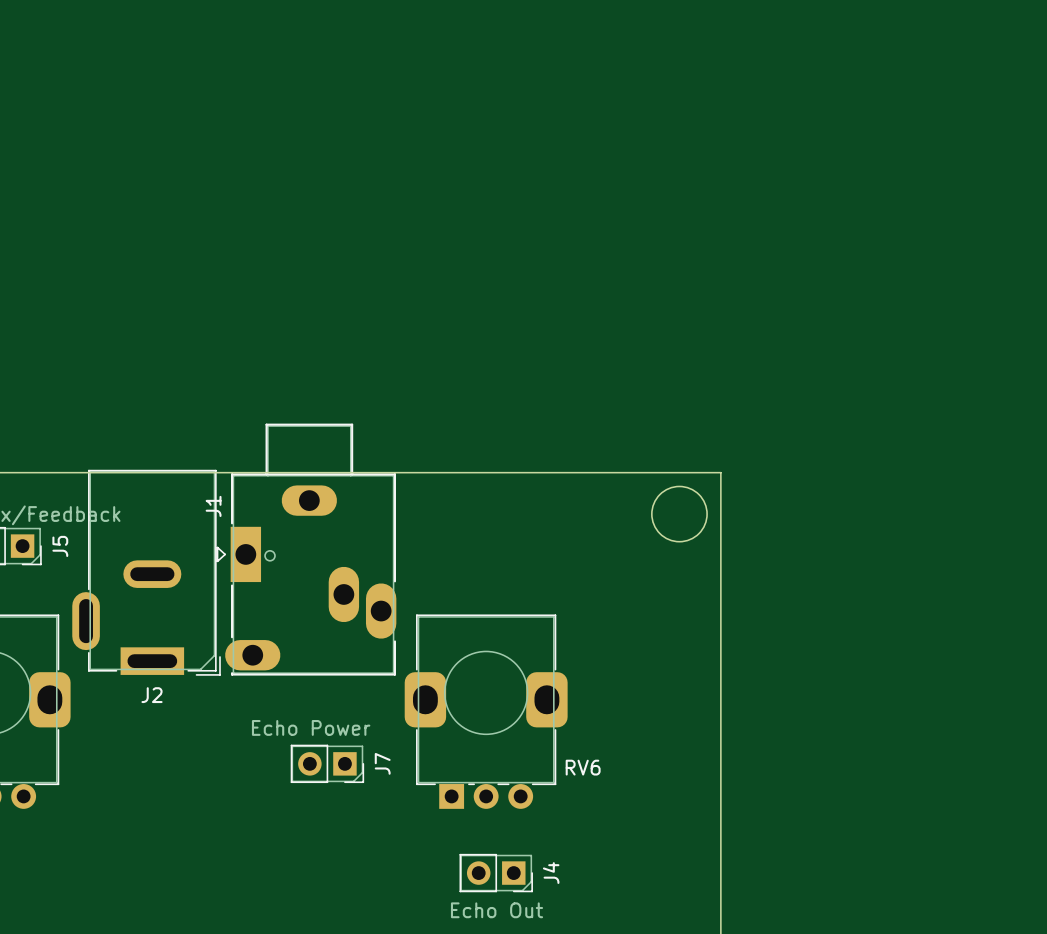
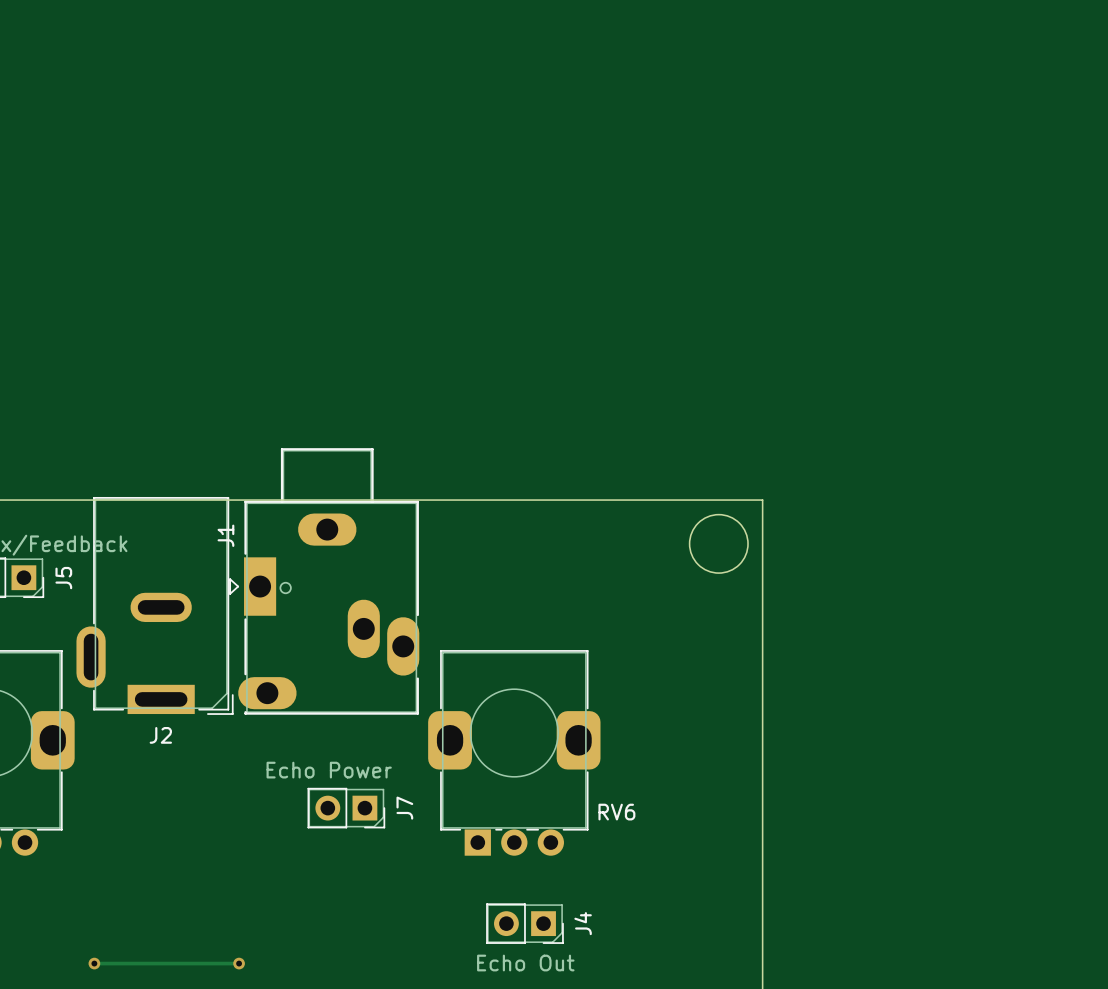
track: none -> (94, 963) (239, 963)
via: none -> (94, 963)
via: none -> (239, 963)

